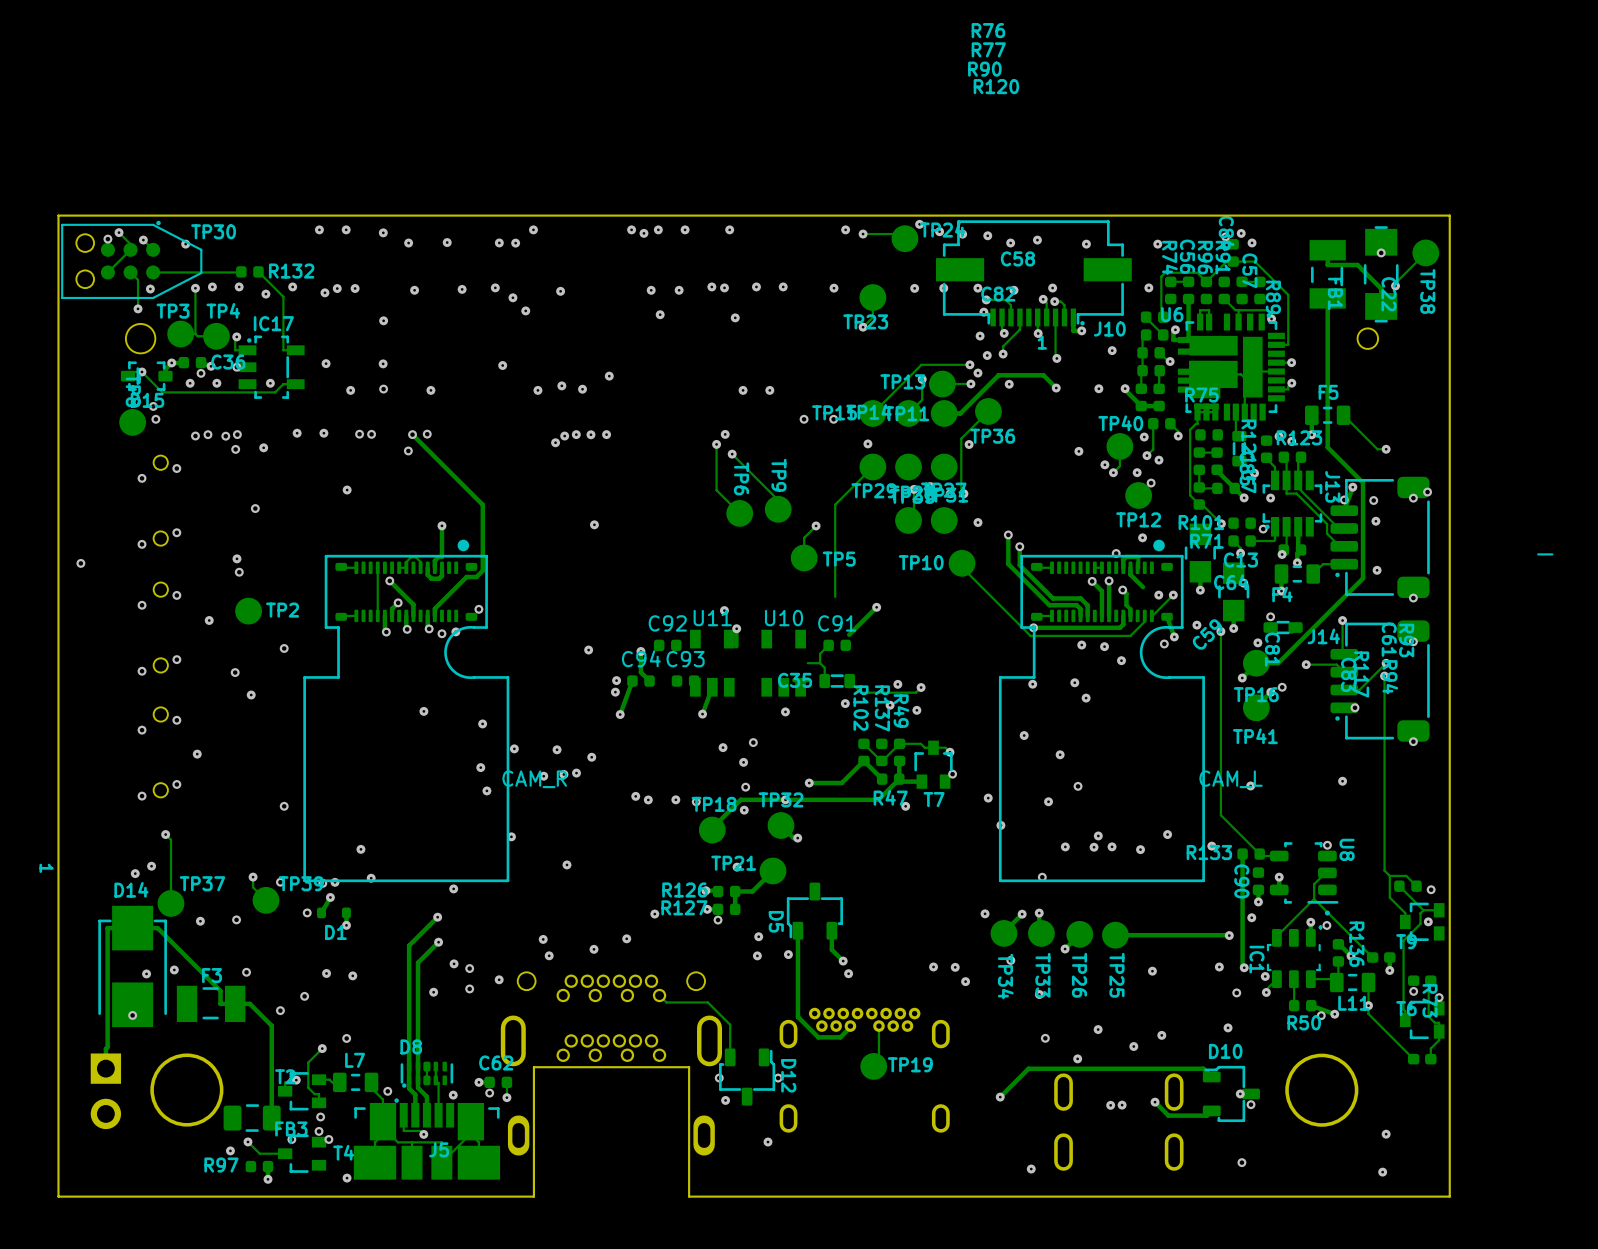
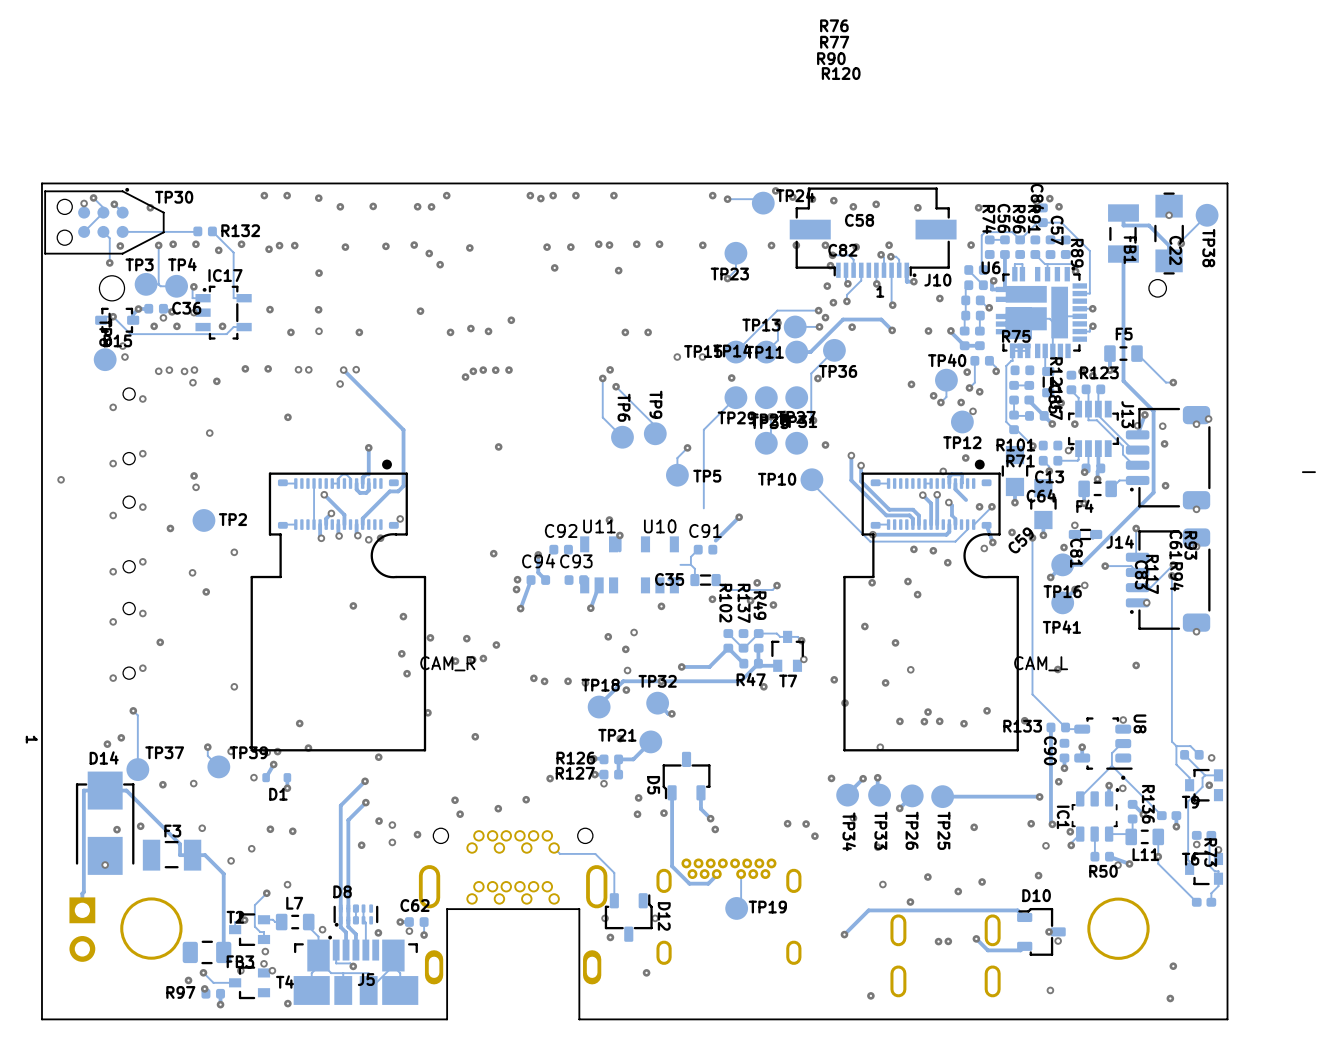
via: none -> (204, 988)

